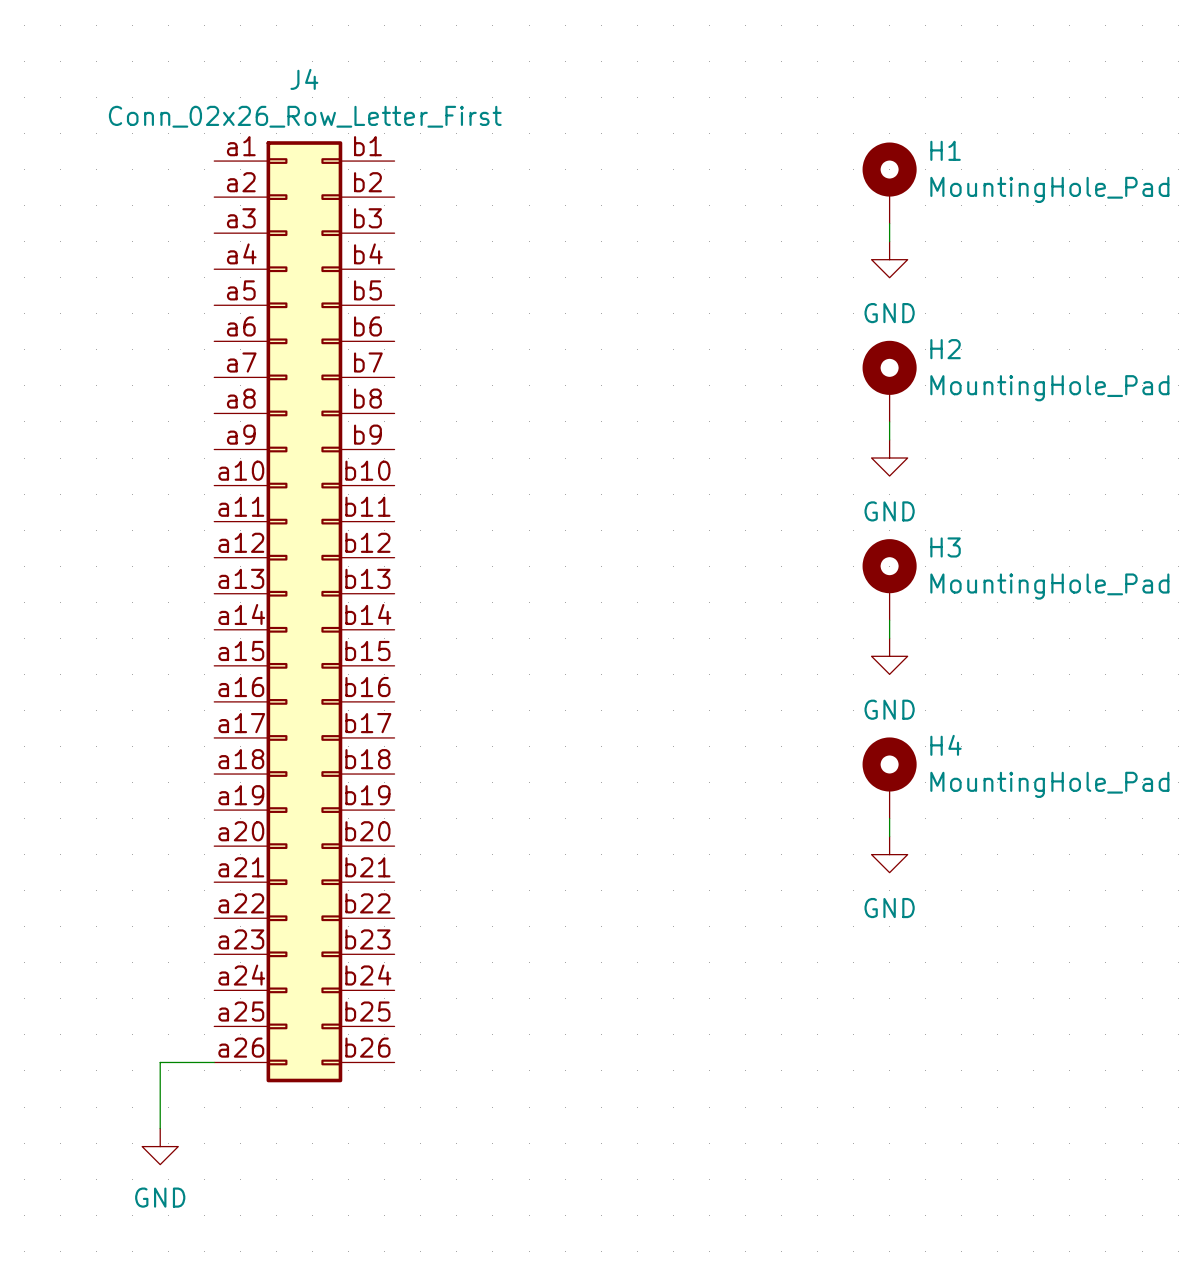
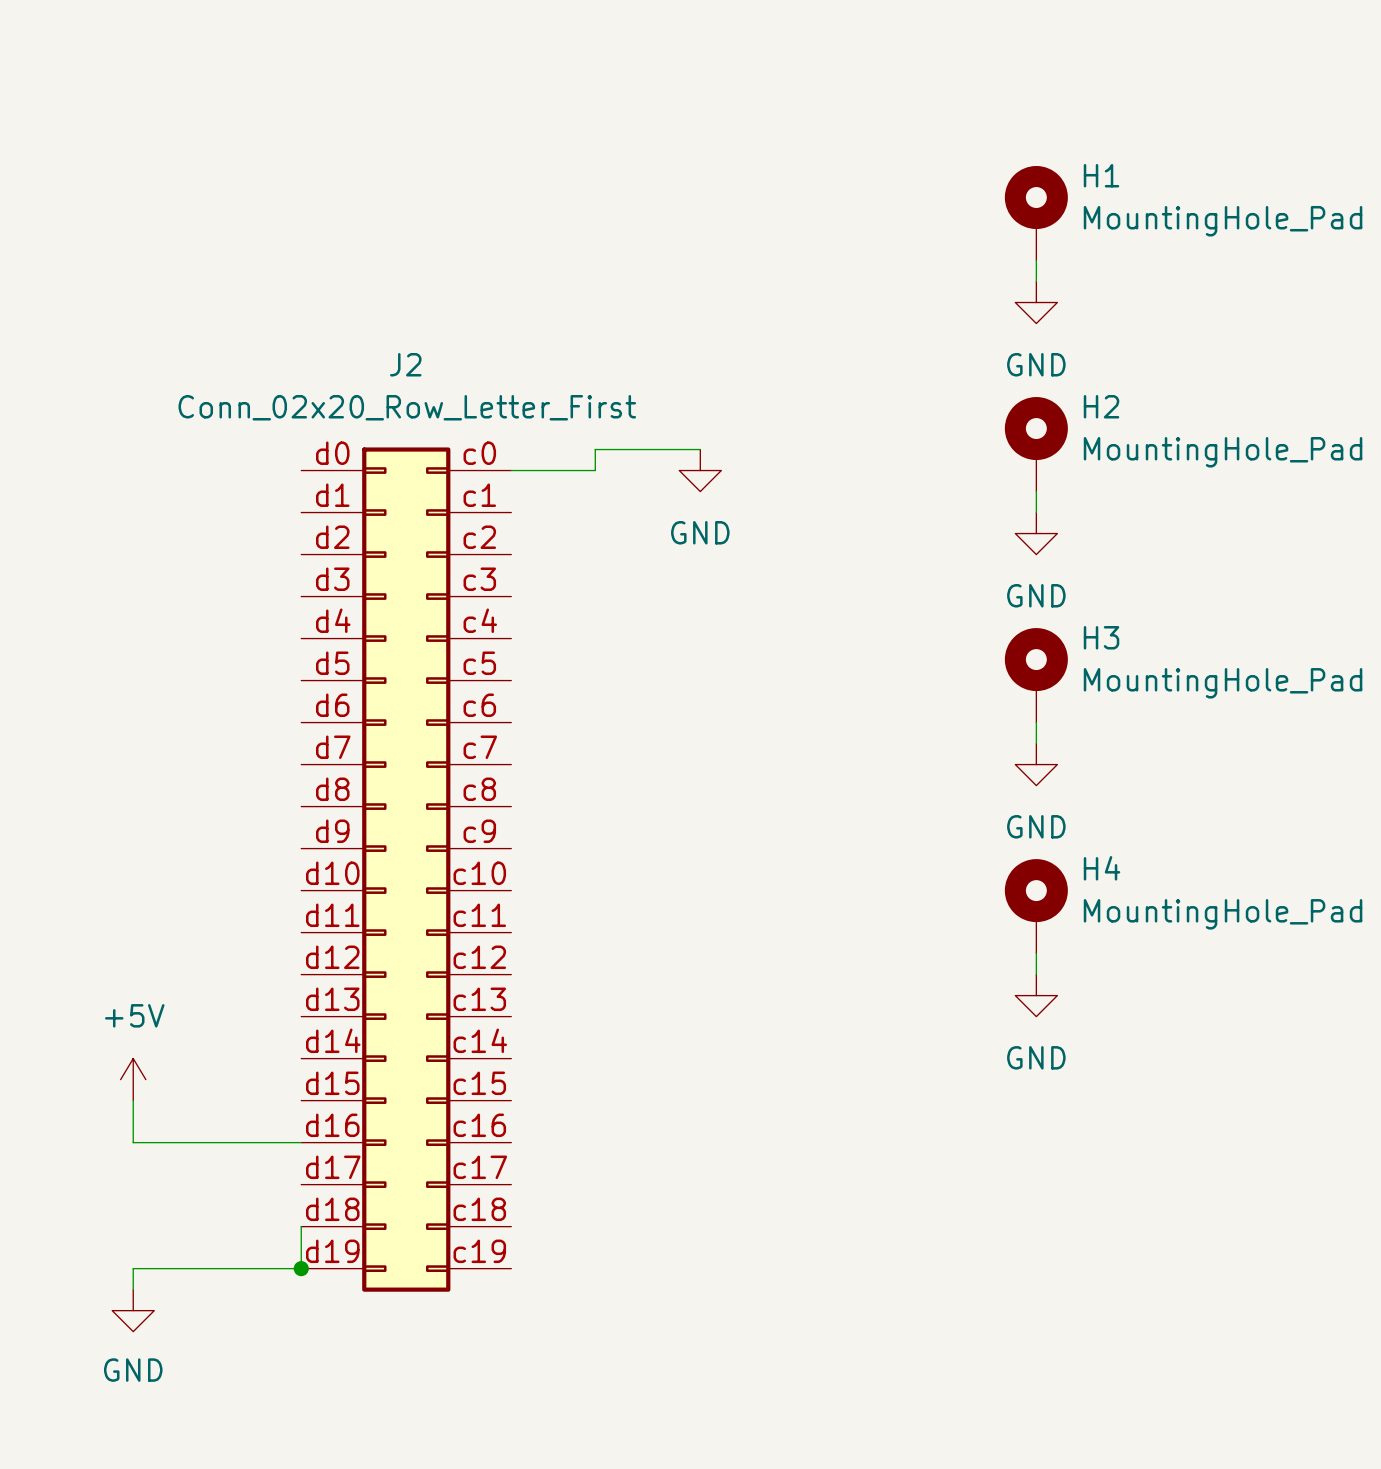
wire: none -> (700, 449) (595, 449) (595, 470) (511, 470)
power symbol: none -> GND (700, 470)
J4: Conn_02x26_Row_Letter_First (304, 611) -> none
J2: none -> Conn_02x20_Row_Letter_First (406, 869)
power symbol: none -> +5V (133, 1079)
wire: none -> (133, 1100) (133, 1142) (301, 1142)
wire: none -> (301, 1226) (301, 1268) (133, 1268) (133, 1289)
wire: (214, 1062) (160, 1062) (160, 1128) -> none
junction: none -> (301, 1268)
power symbol position: GND (160, 1146) -> GND (133, 1310)

